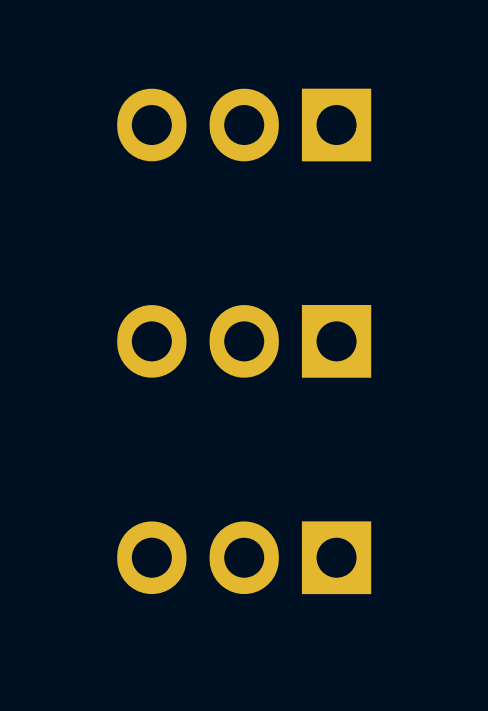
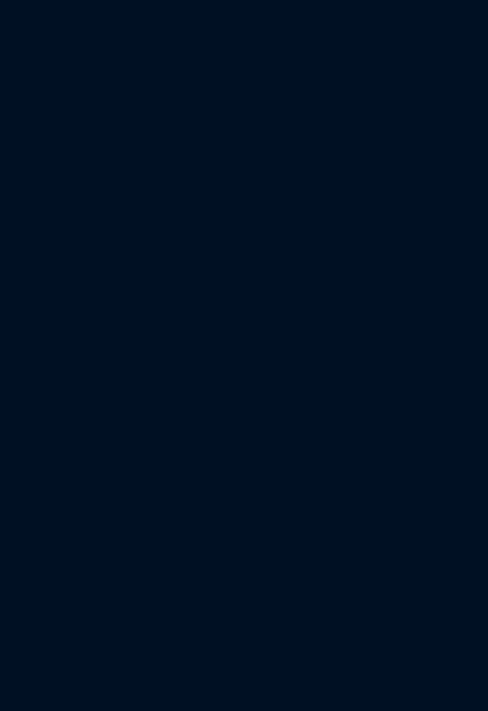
part: (244, 125) -> none
part: (244, 341) -> none
part: (244, 557) -> none

